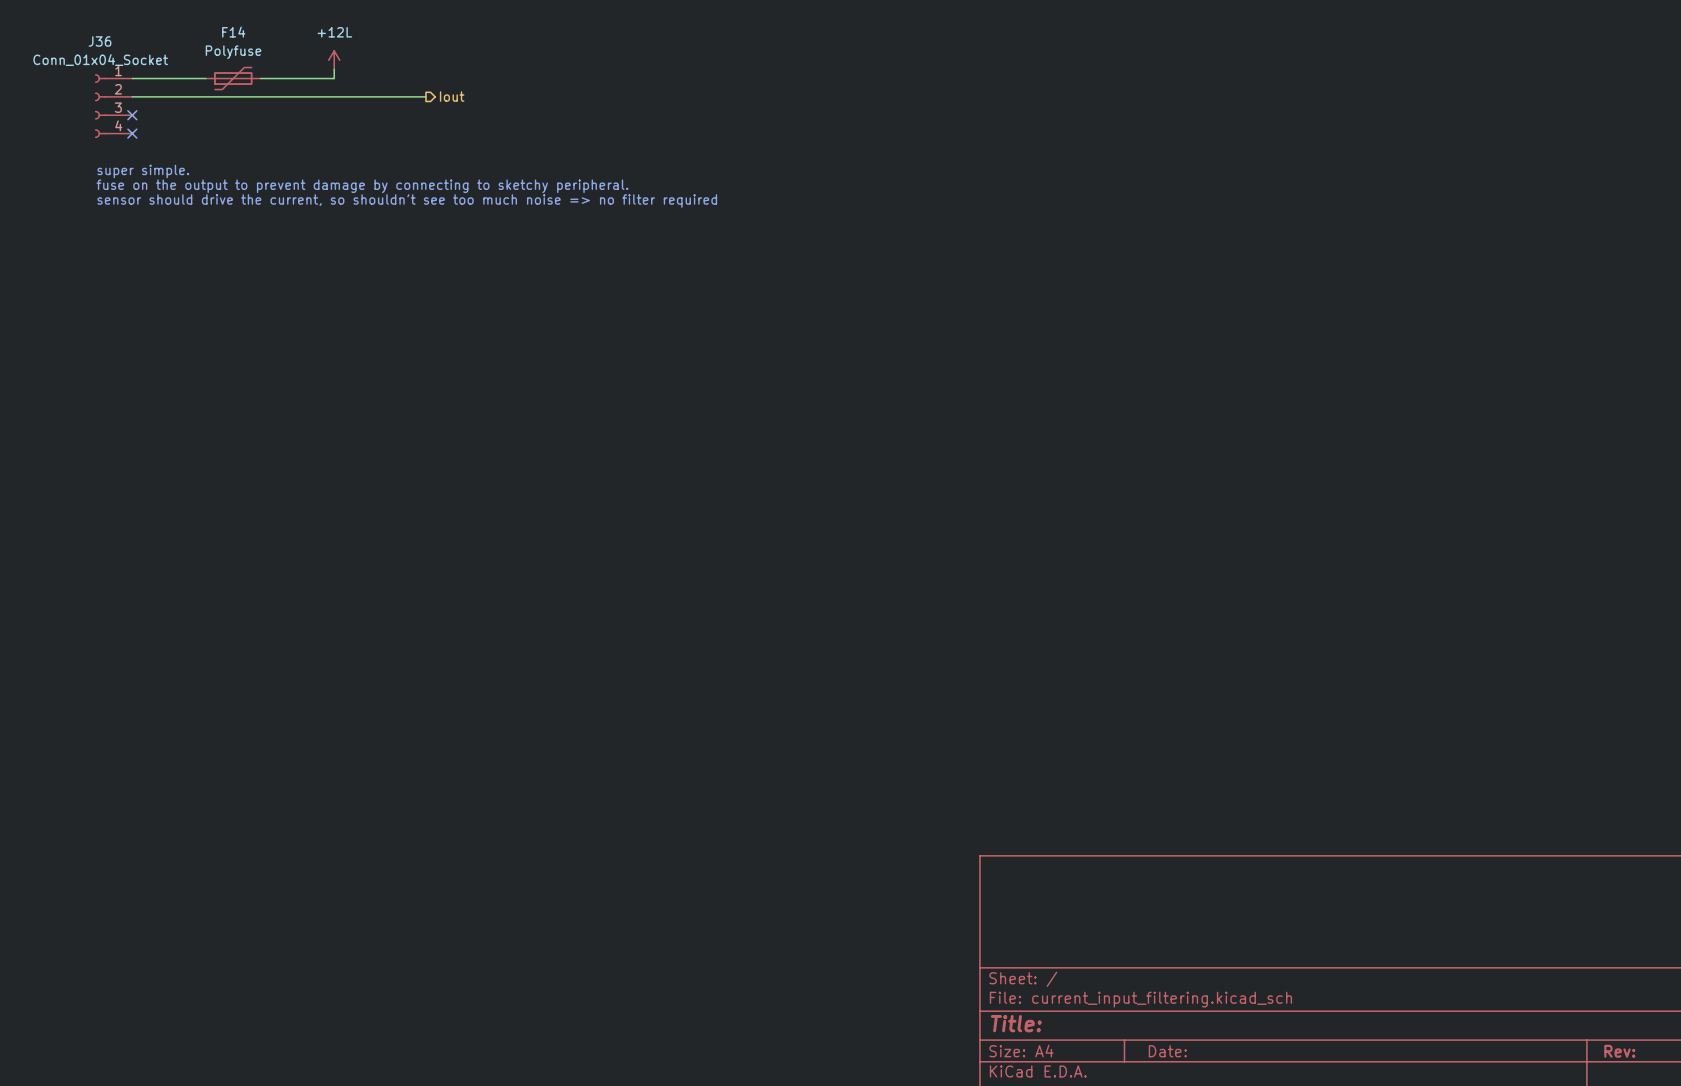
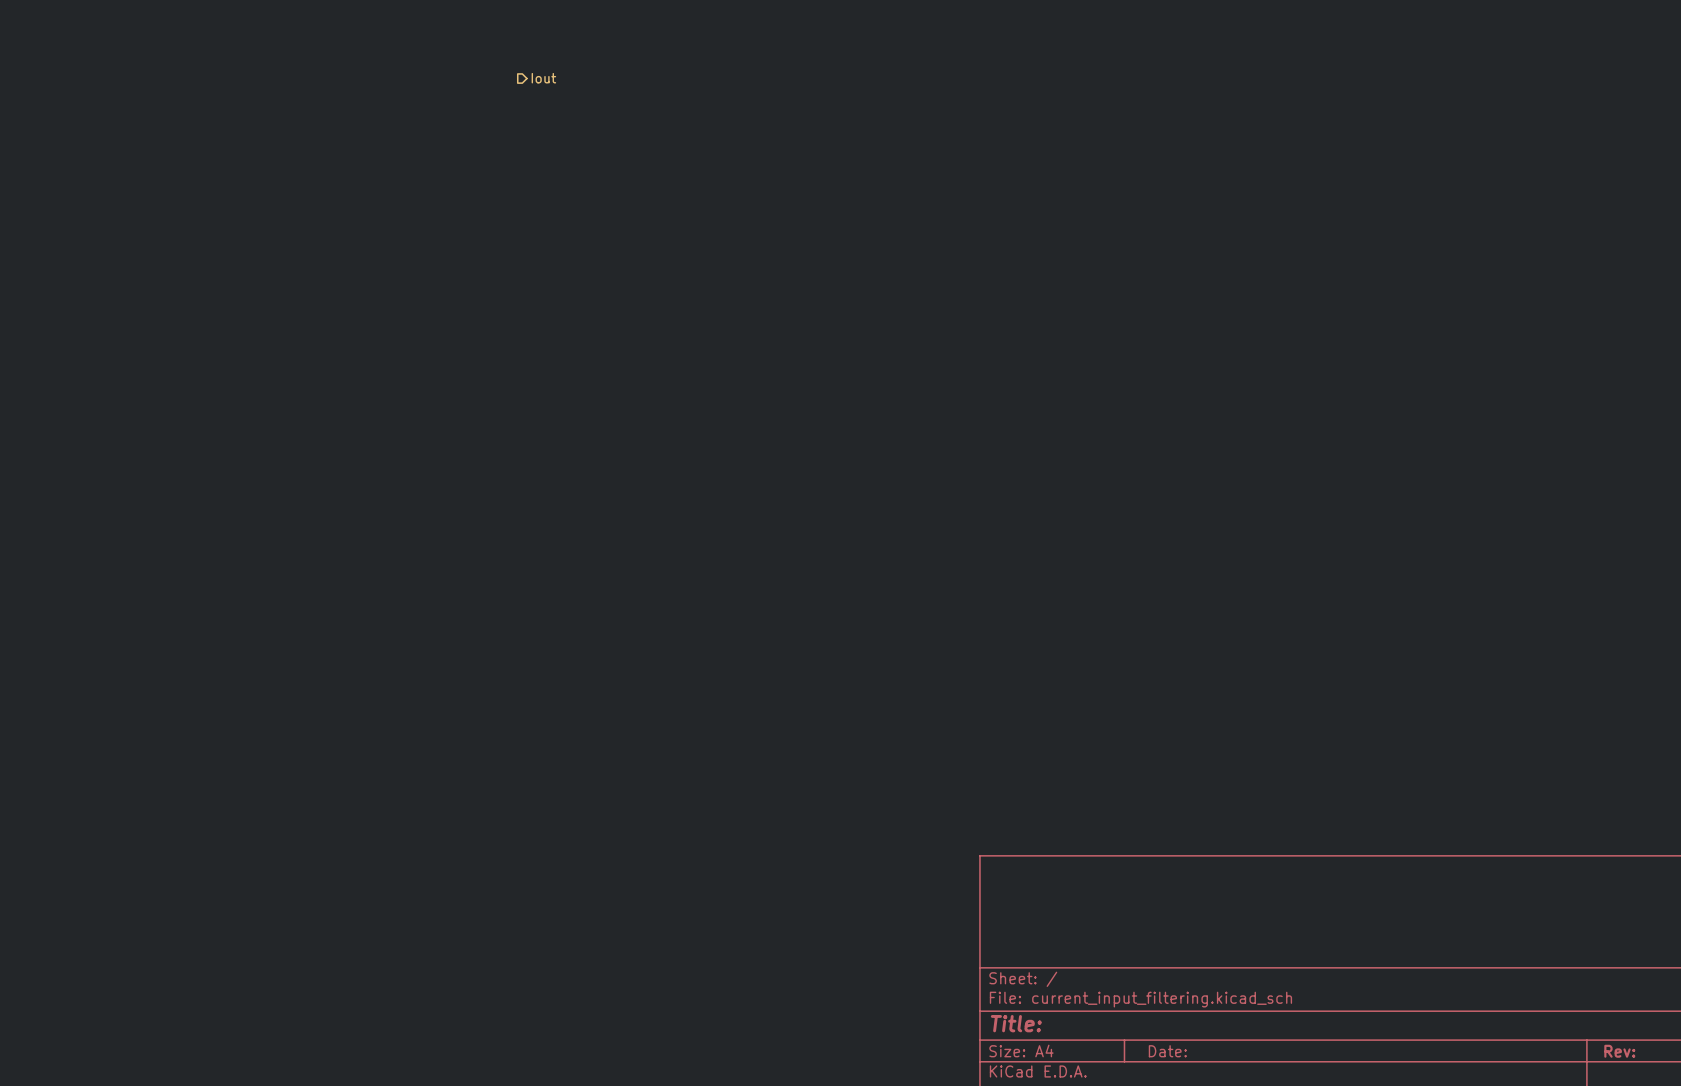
power symbol: +12L (334, 60) -> none
wire: (334, 69) (334, 78) (260, 78) -> none
wire: (132, 78) (205, 78) -> none
F14: Polyfuse (233, 78) -> none
wire: (132, 96) (425, 96) -> none
hierarchical label position: Iout (452, 96) -> Iout (543, 78)
J36: Conn_01x04_Socket (113, 106) -> none
no-connect mark: (132, 115) -> none
no-connect mark: (132, 133) -> none
text: super simple. (143, 171) -> none
text: fuse on the output to prevent damage by connecting to sketchy peripheral. (362, 186) -> none
text: sensor should drive the current, so shouldn't see too much noise => no filter required (407, 201) -> none

